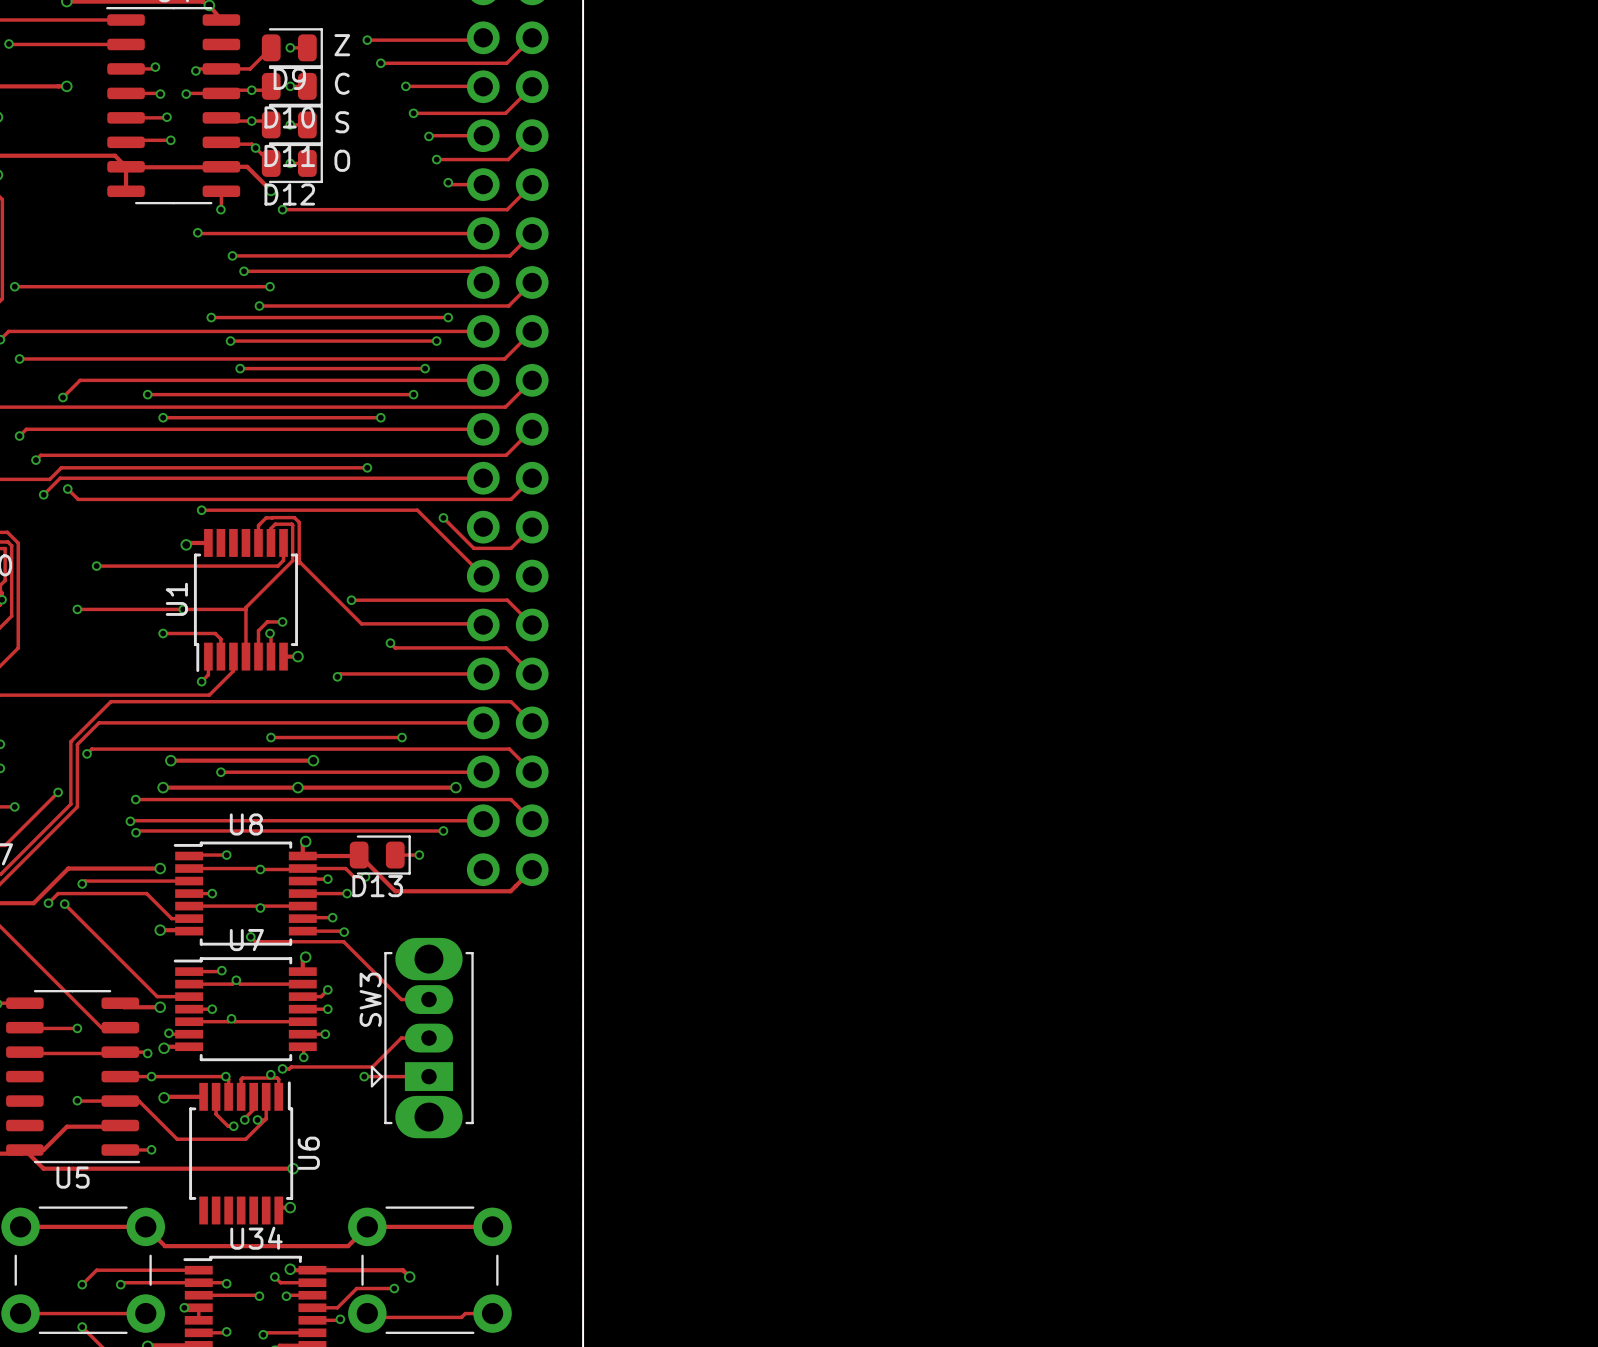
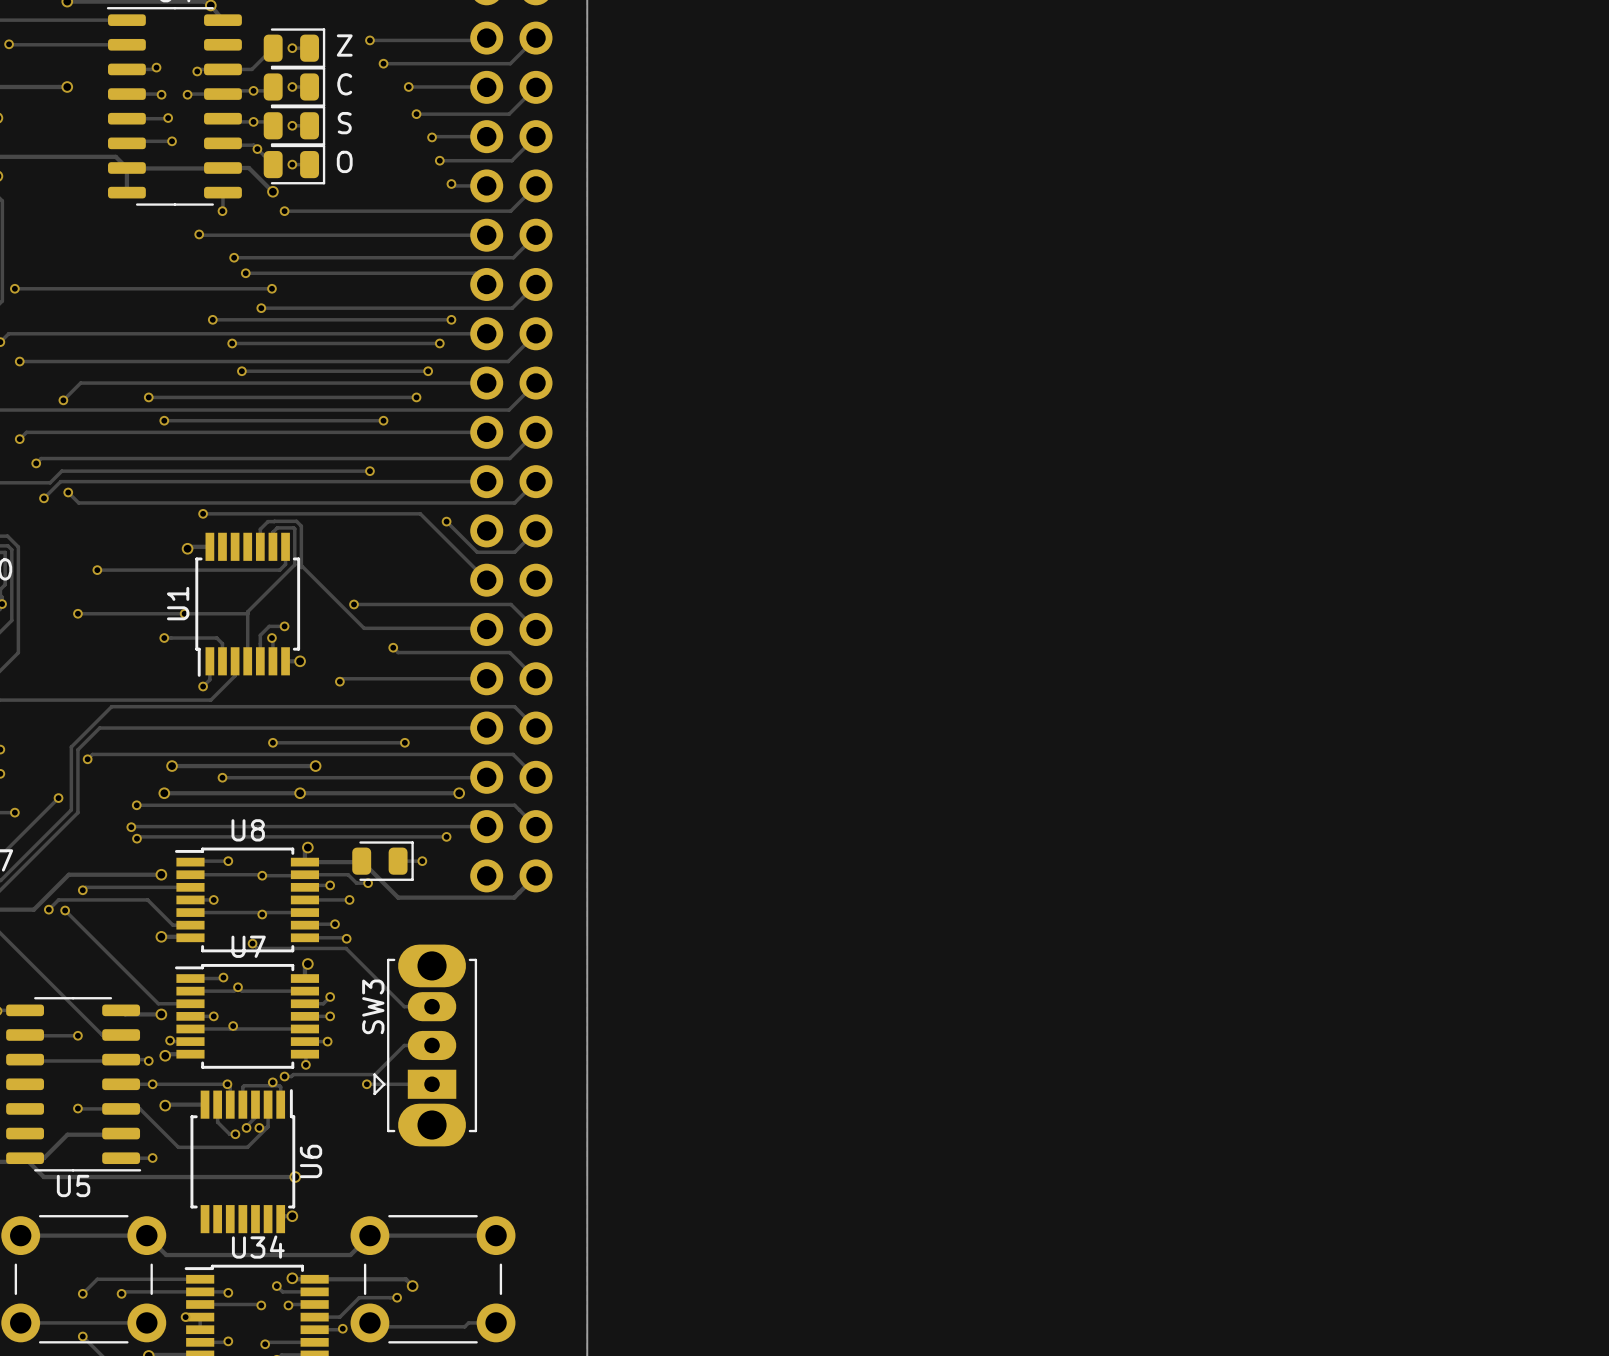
D9 name: D9 (289, 78) -> none
D10 name: D10 (289, 117) -> none
D11 name: D11 (289, 155) -> none
D12 name: D12 (289, 194) -> none
D13 name: D13 (377, 886) -> none

